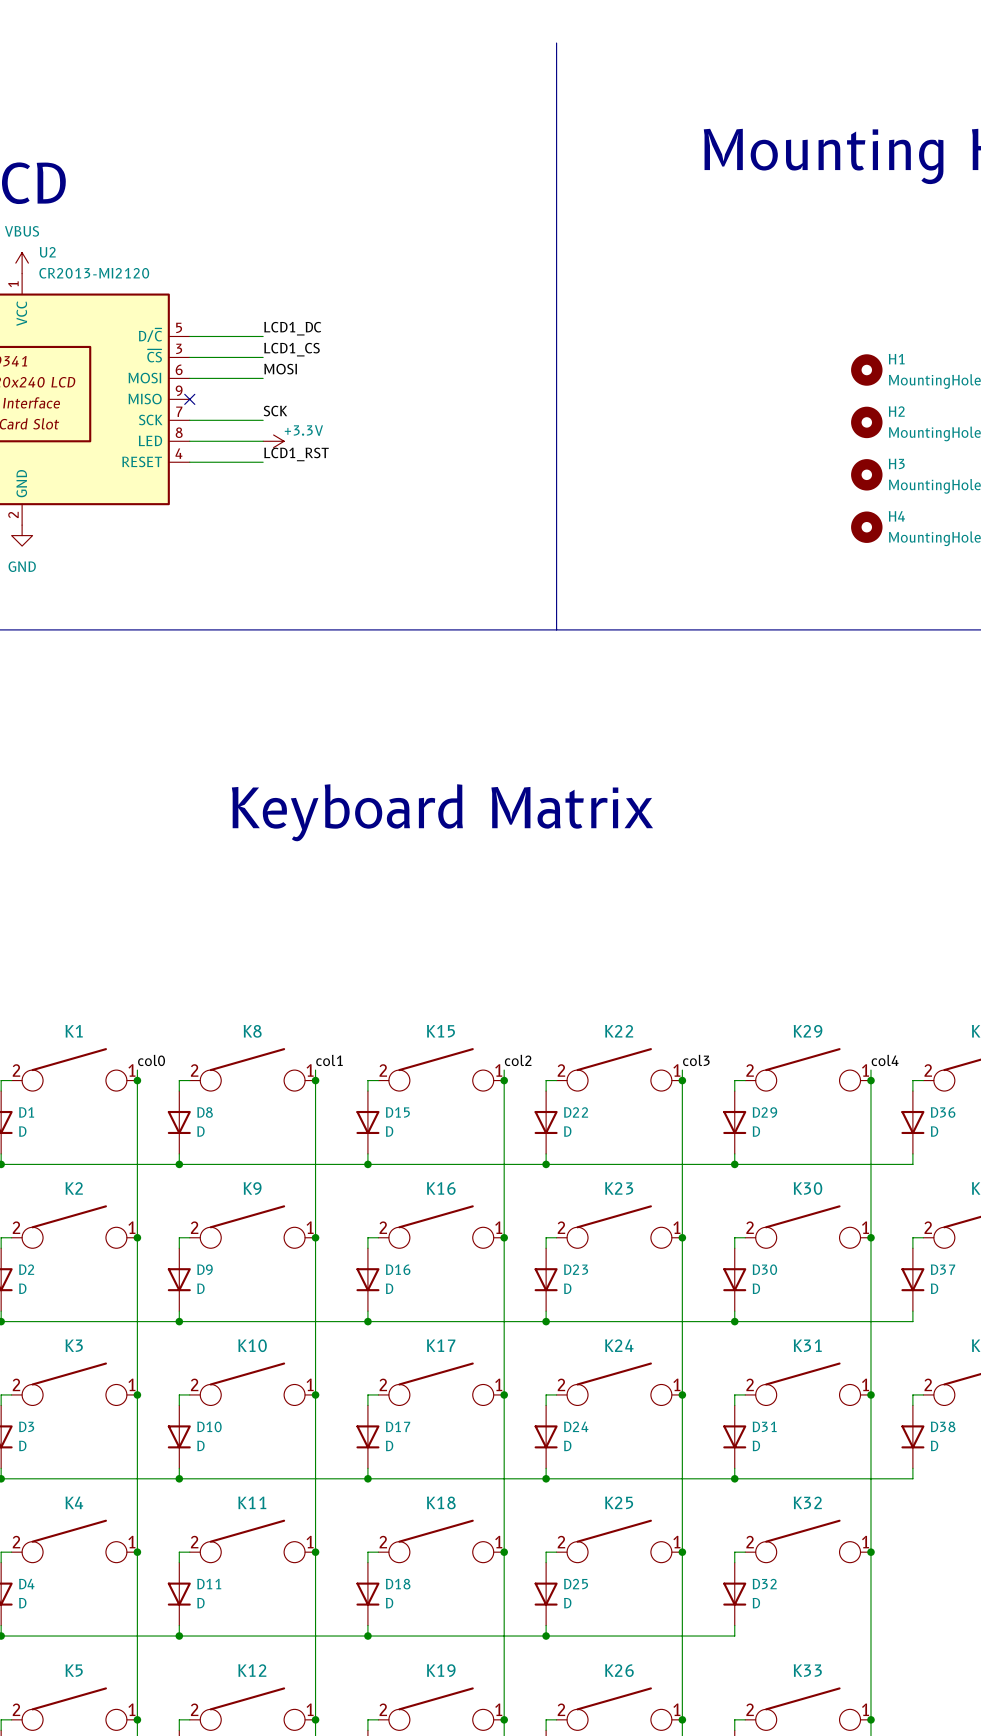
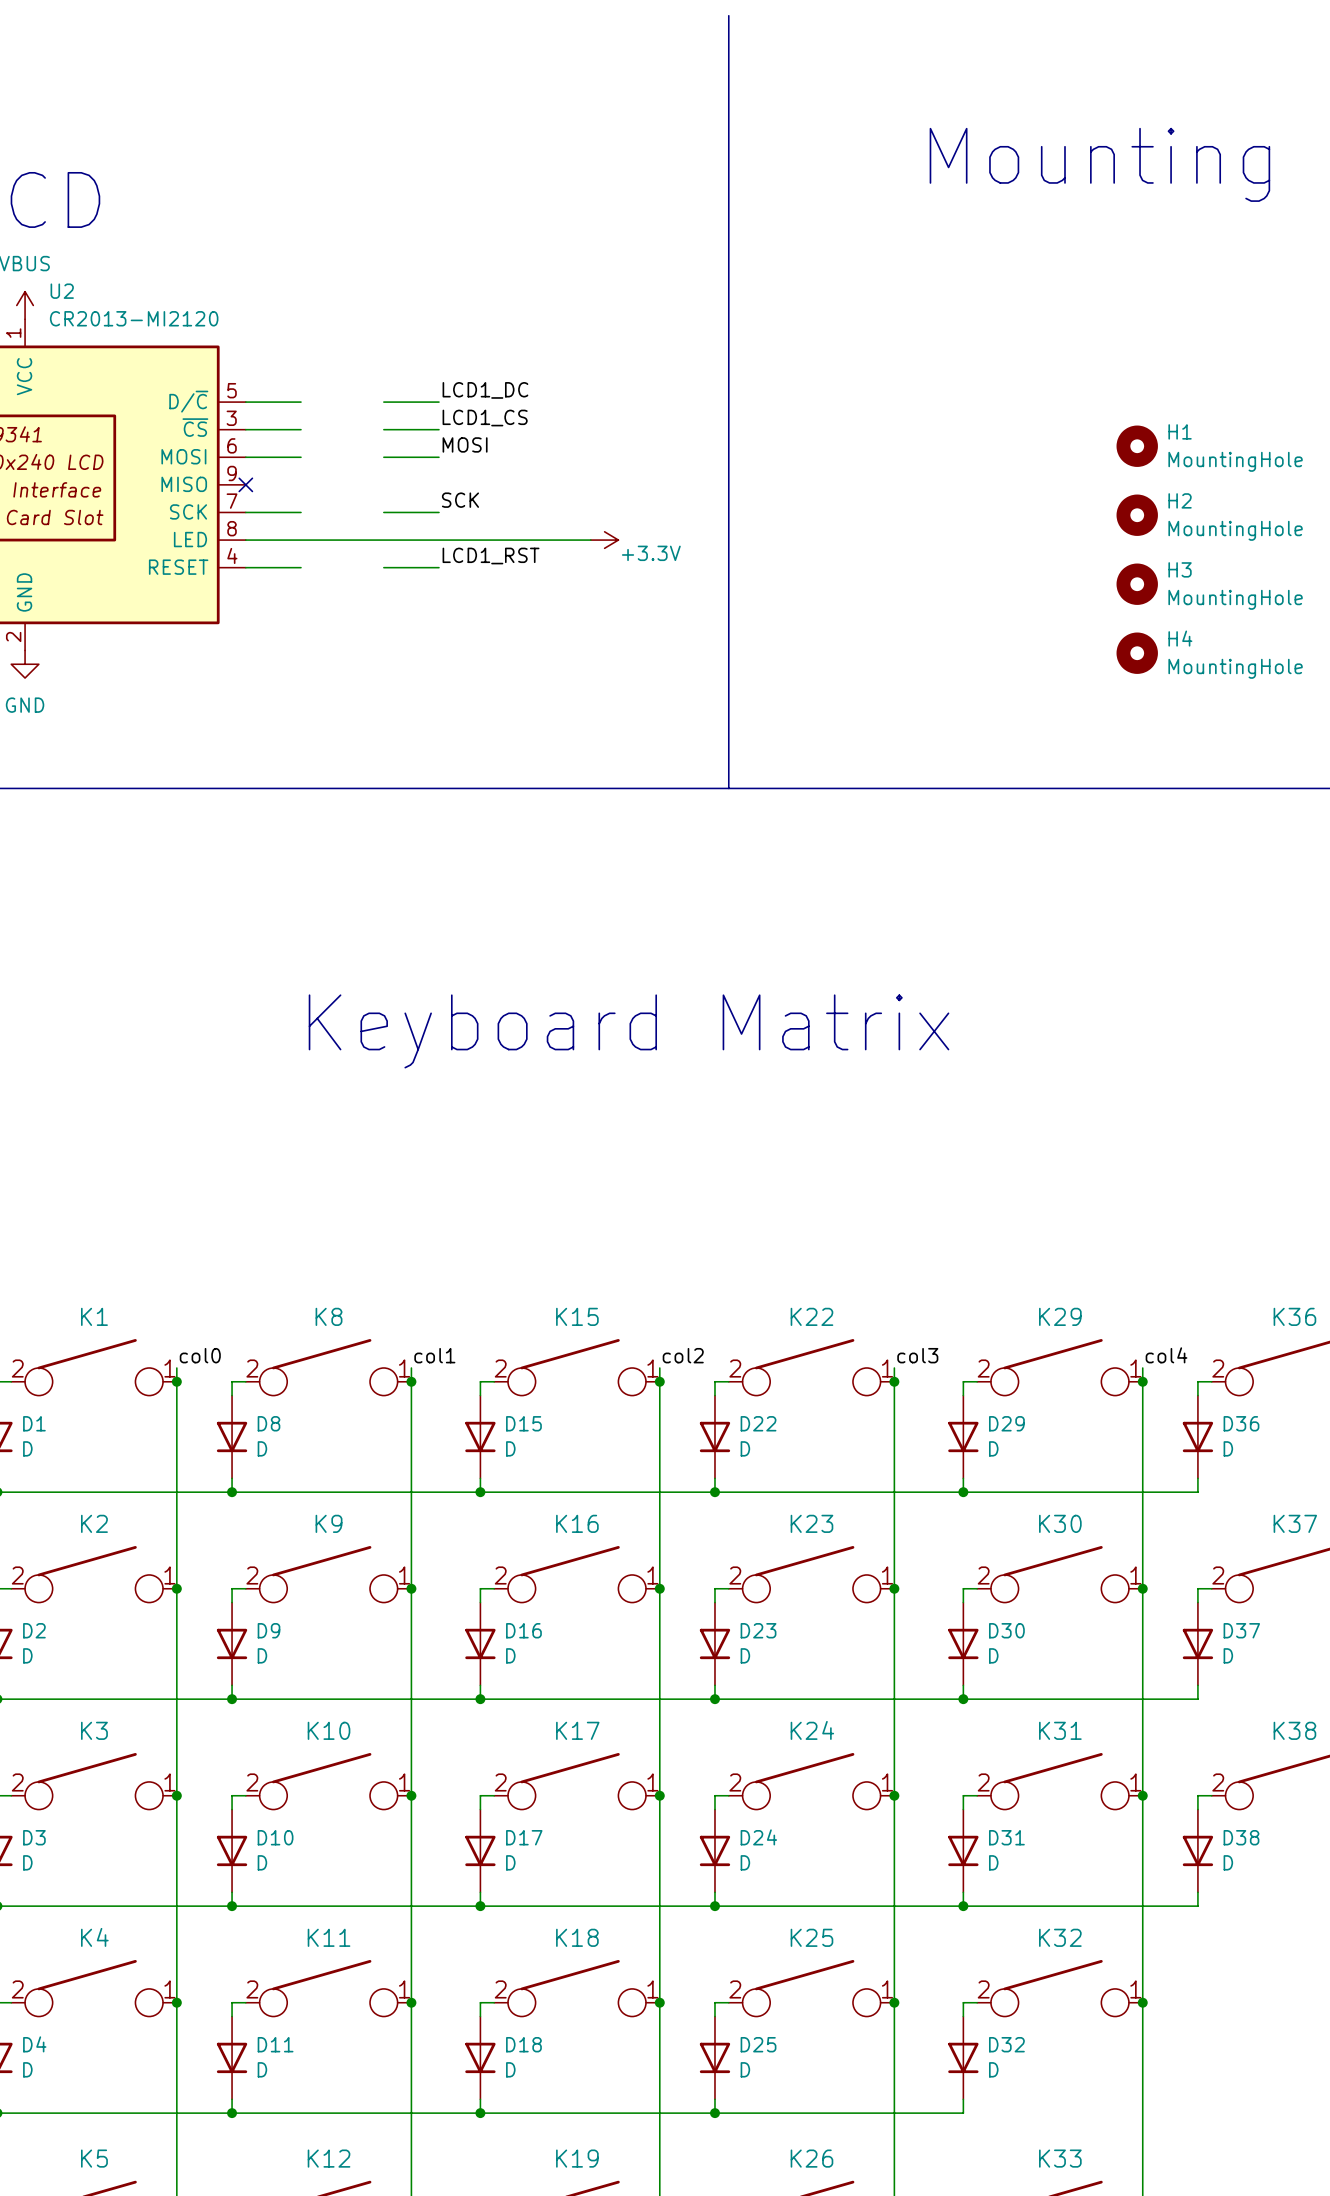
label position: LCD1_DC (292, 328) -> LCD1_DC (485, 390)
wire: (231, 336) (263, 336) -> none
wire: none -> (383, 402) (439, 402)
label position: LCD1_CS (291, 349) -> LCD1_CS (485, 418)
wire: (231, 357) (263, 357) -> none
wire: none -> (383, 429) (439, 429)
label position: MOSI (280, 369) -> MOSI (465, 444)
wire: (231, 378) (263, 378) -> none
wire: none -> (383, 457) (439, 457)
label position: SCK (275, 411) -> SCK (460, 500)
wire: (231, 420) (263, 420) -> none
wire: none -> (383, 512) (439, 512)
power symbol text position: +3.3V (303, 430) -> +3.3V (651, 553)
wire: none -> (342, 540) (590, 540)
power symbol position: +3.3V (273, 441) -> +3.3V (604, 540)
label position: LCD1_RST (296, 454) -> LCD1_RST (491, 556)
wire: (231, 462) (263, 462) -> none
wire: none -> (383, 567) (439, 567)

